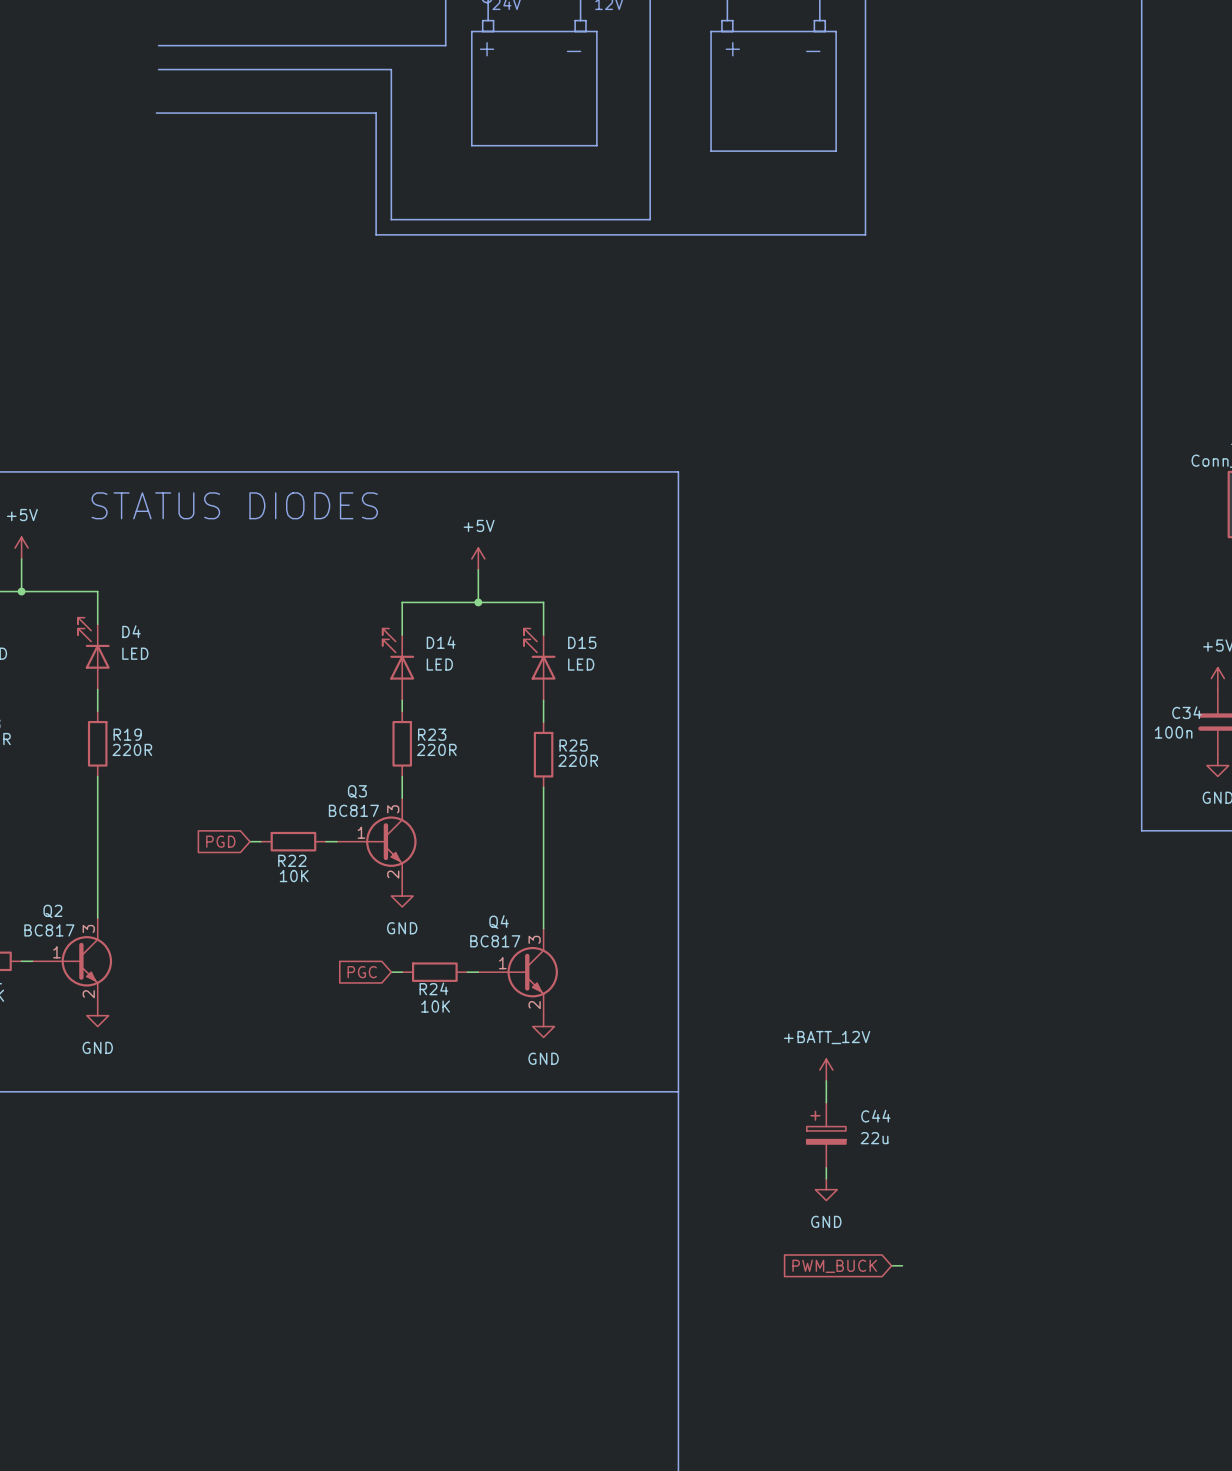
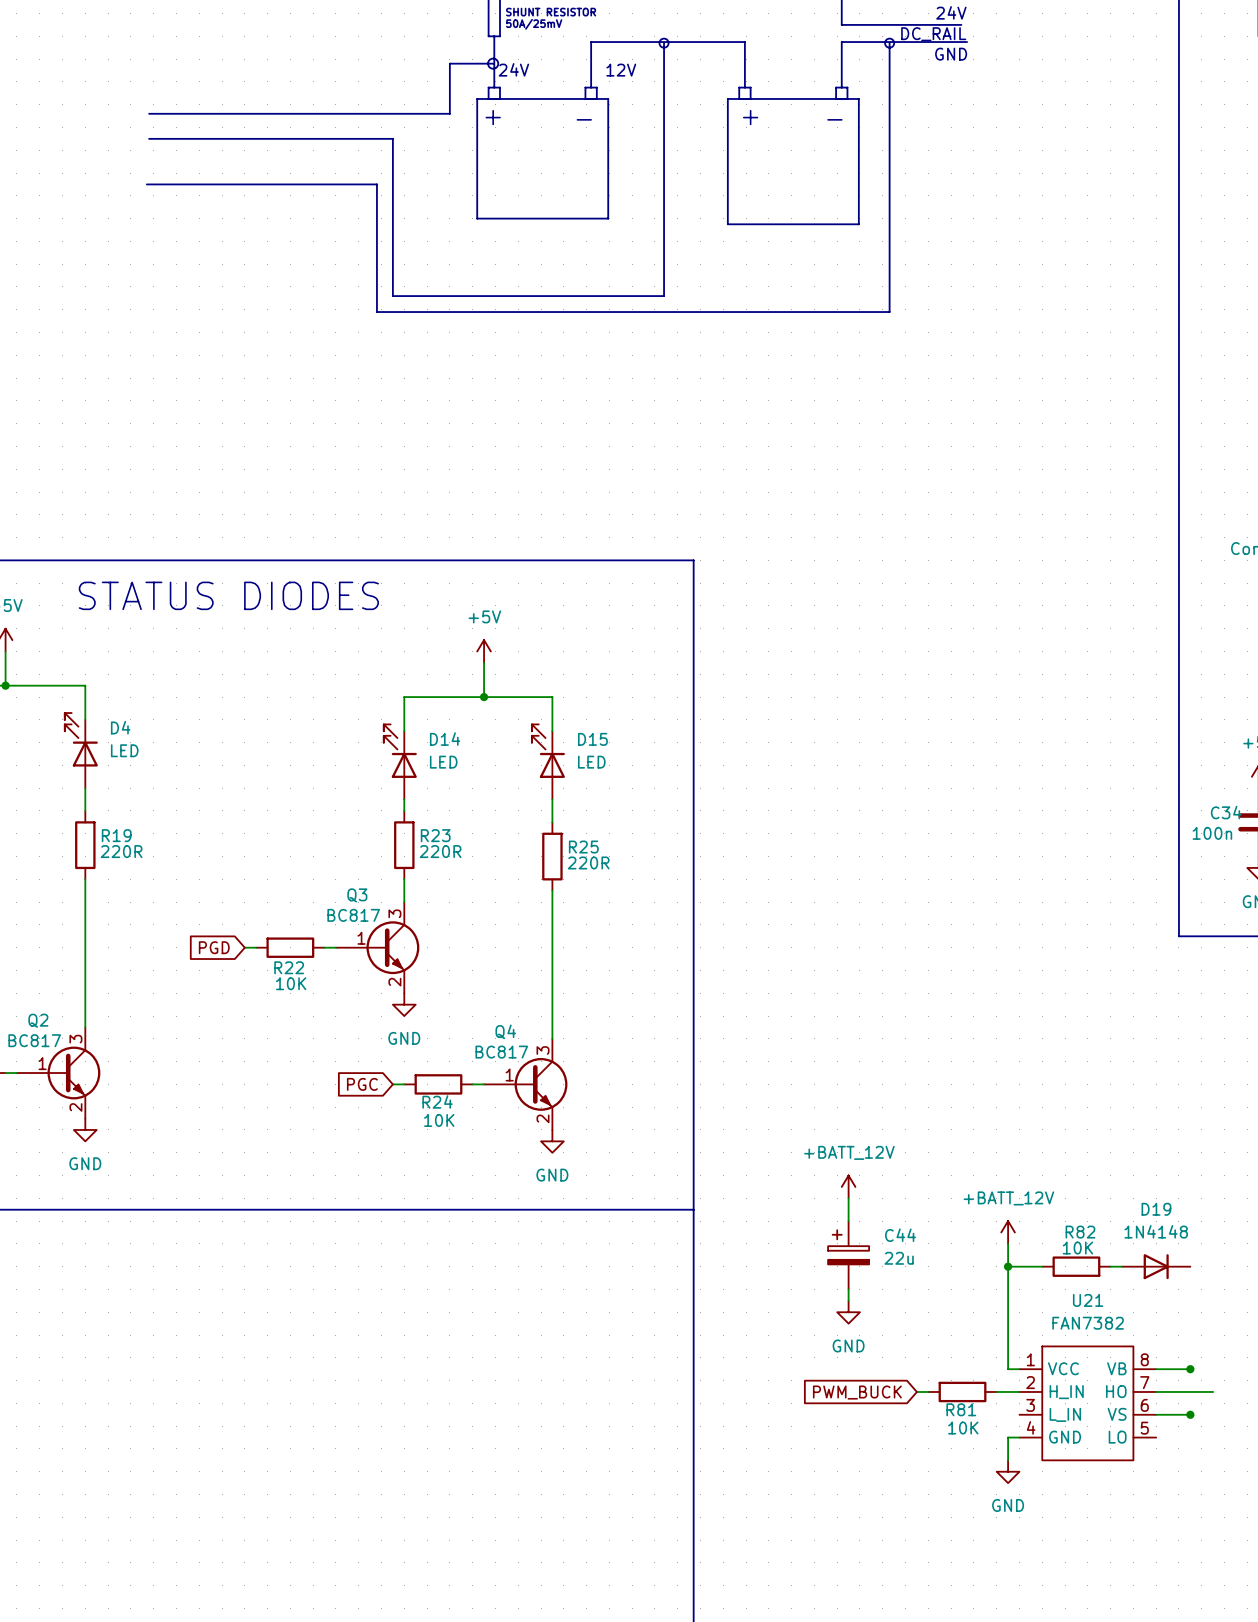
power symbol: none -> +BATT_12V (1008, 1232)
wire: none -> (1008, 1243) (1008, 1369) (1019, 1369)
wire: none -> (1008, 1266) (1042, 1266)
junction: none -> (1008, 1266)
R82: none -> 10K (1076, 1266)
wire: none -> (1110, 1266) (1122, 1266)
D19: none -> 1N4148 (1156, 1266)
wire: none -> (1156, 1369) (1190, 1369)
junction: none -> (1190, 1369)
R81: none -> 10K (962, 1391)
wire: none -> (996, 1391) (1019, 1391)
wire: none -> (1156, 1391) (1213, 1391)
U21: none -> FAN7382 (1087, 1403)
wire: none -> (1156, 1414) (1190, 1414)
junction: none -> (1190, 1414)
wire: none -> (1019, 1437) (1008, 1437) (1008, 1460)
power symbol: none -> GND (1008, 1471)

